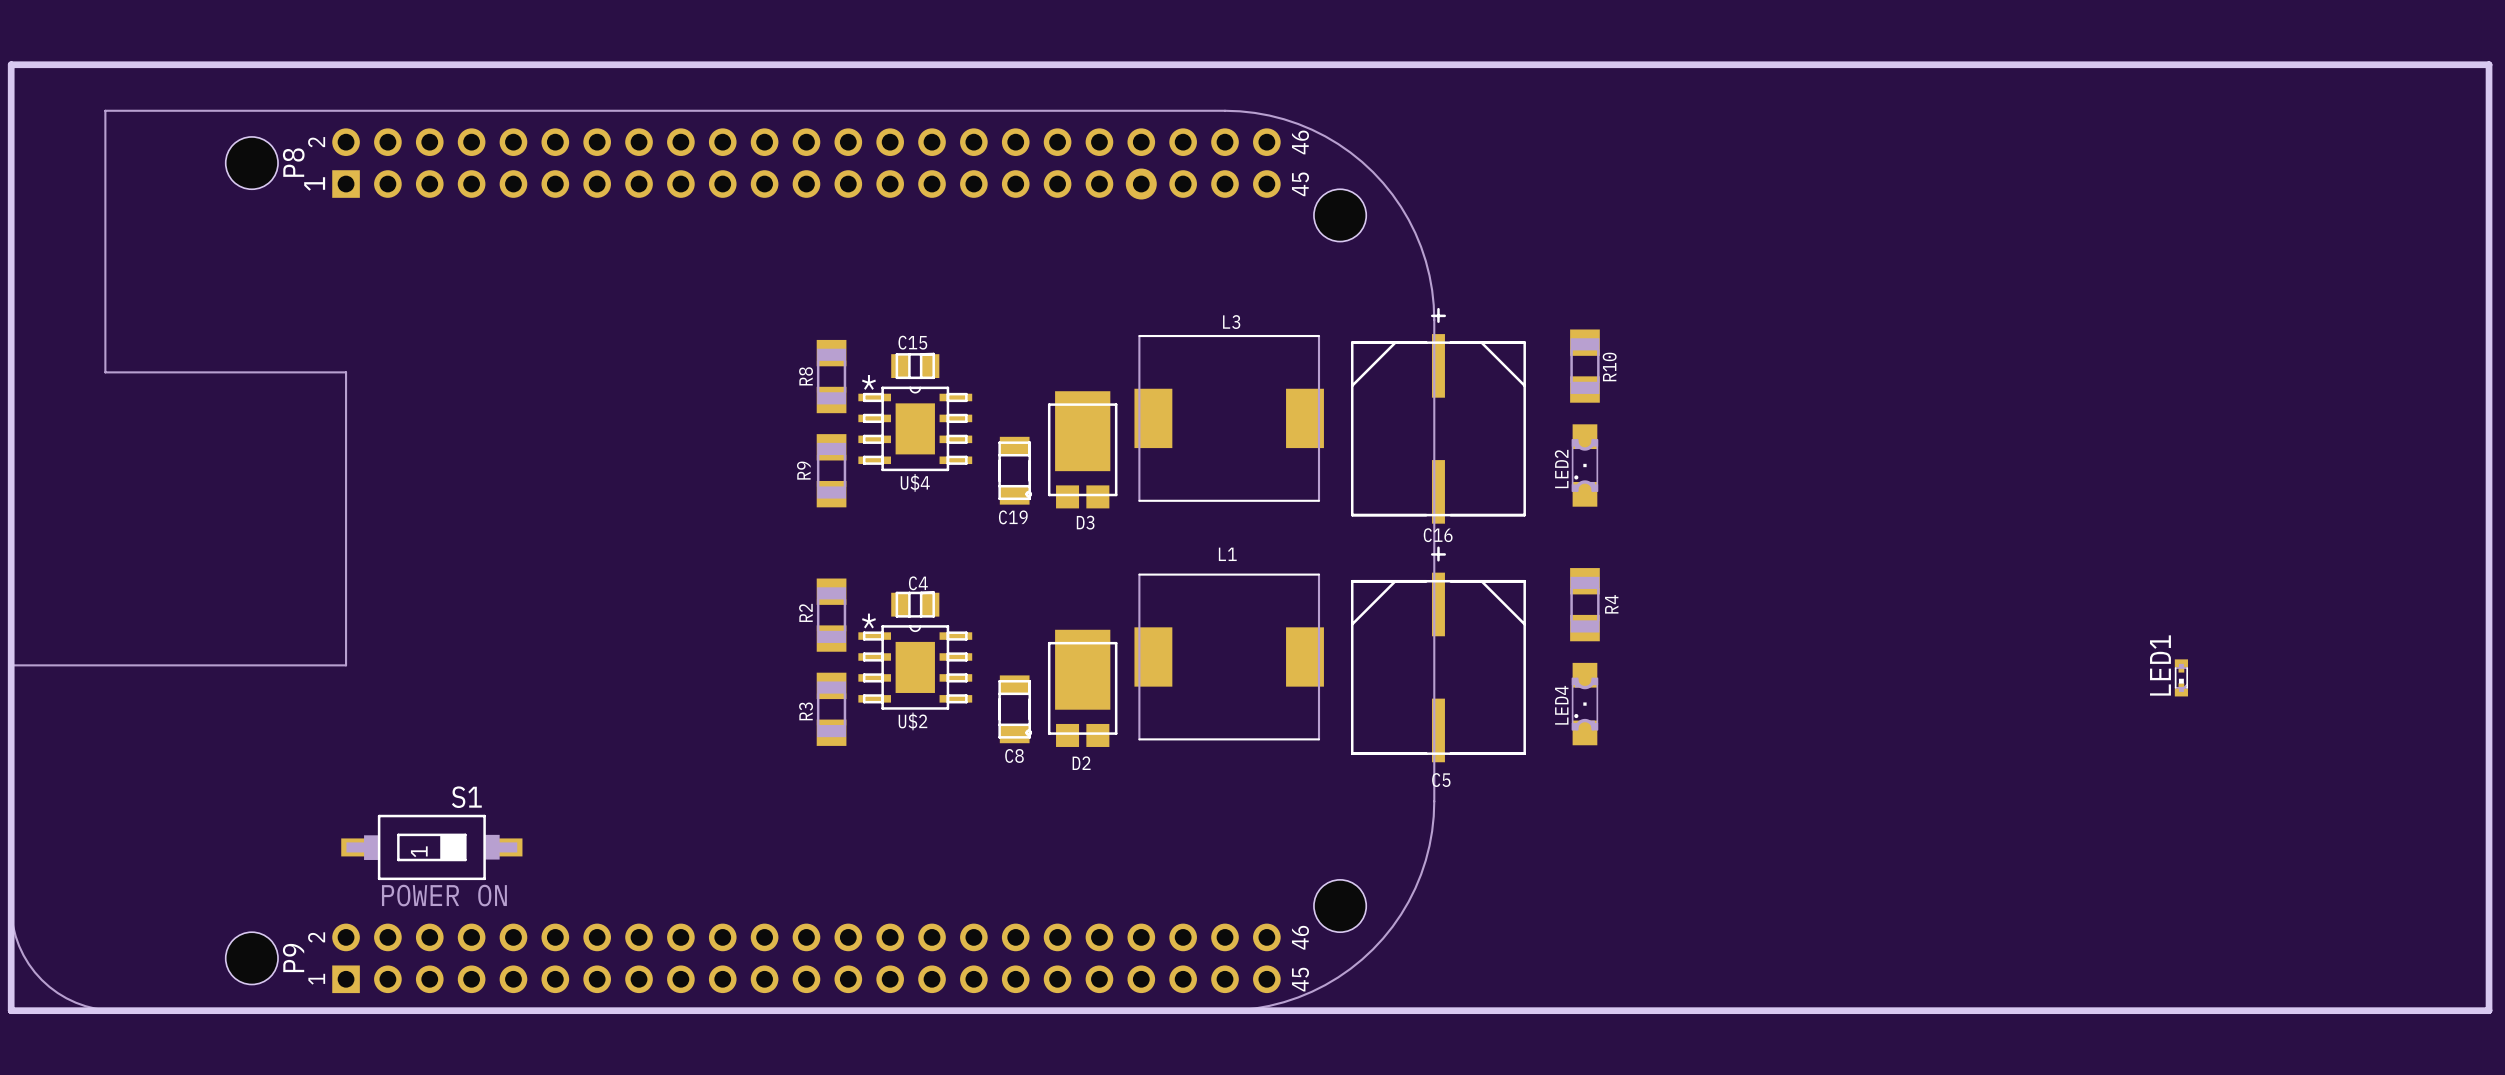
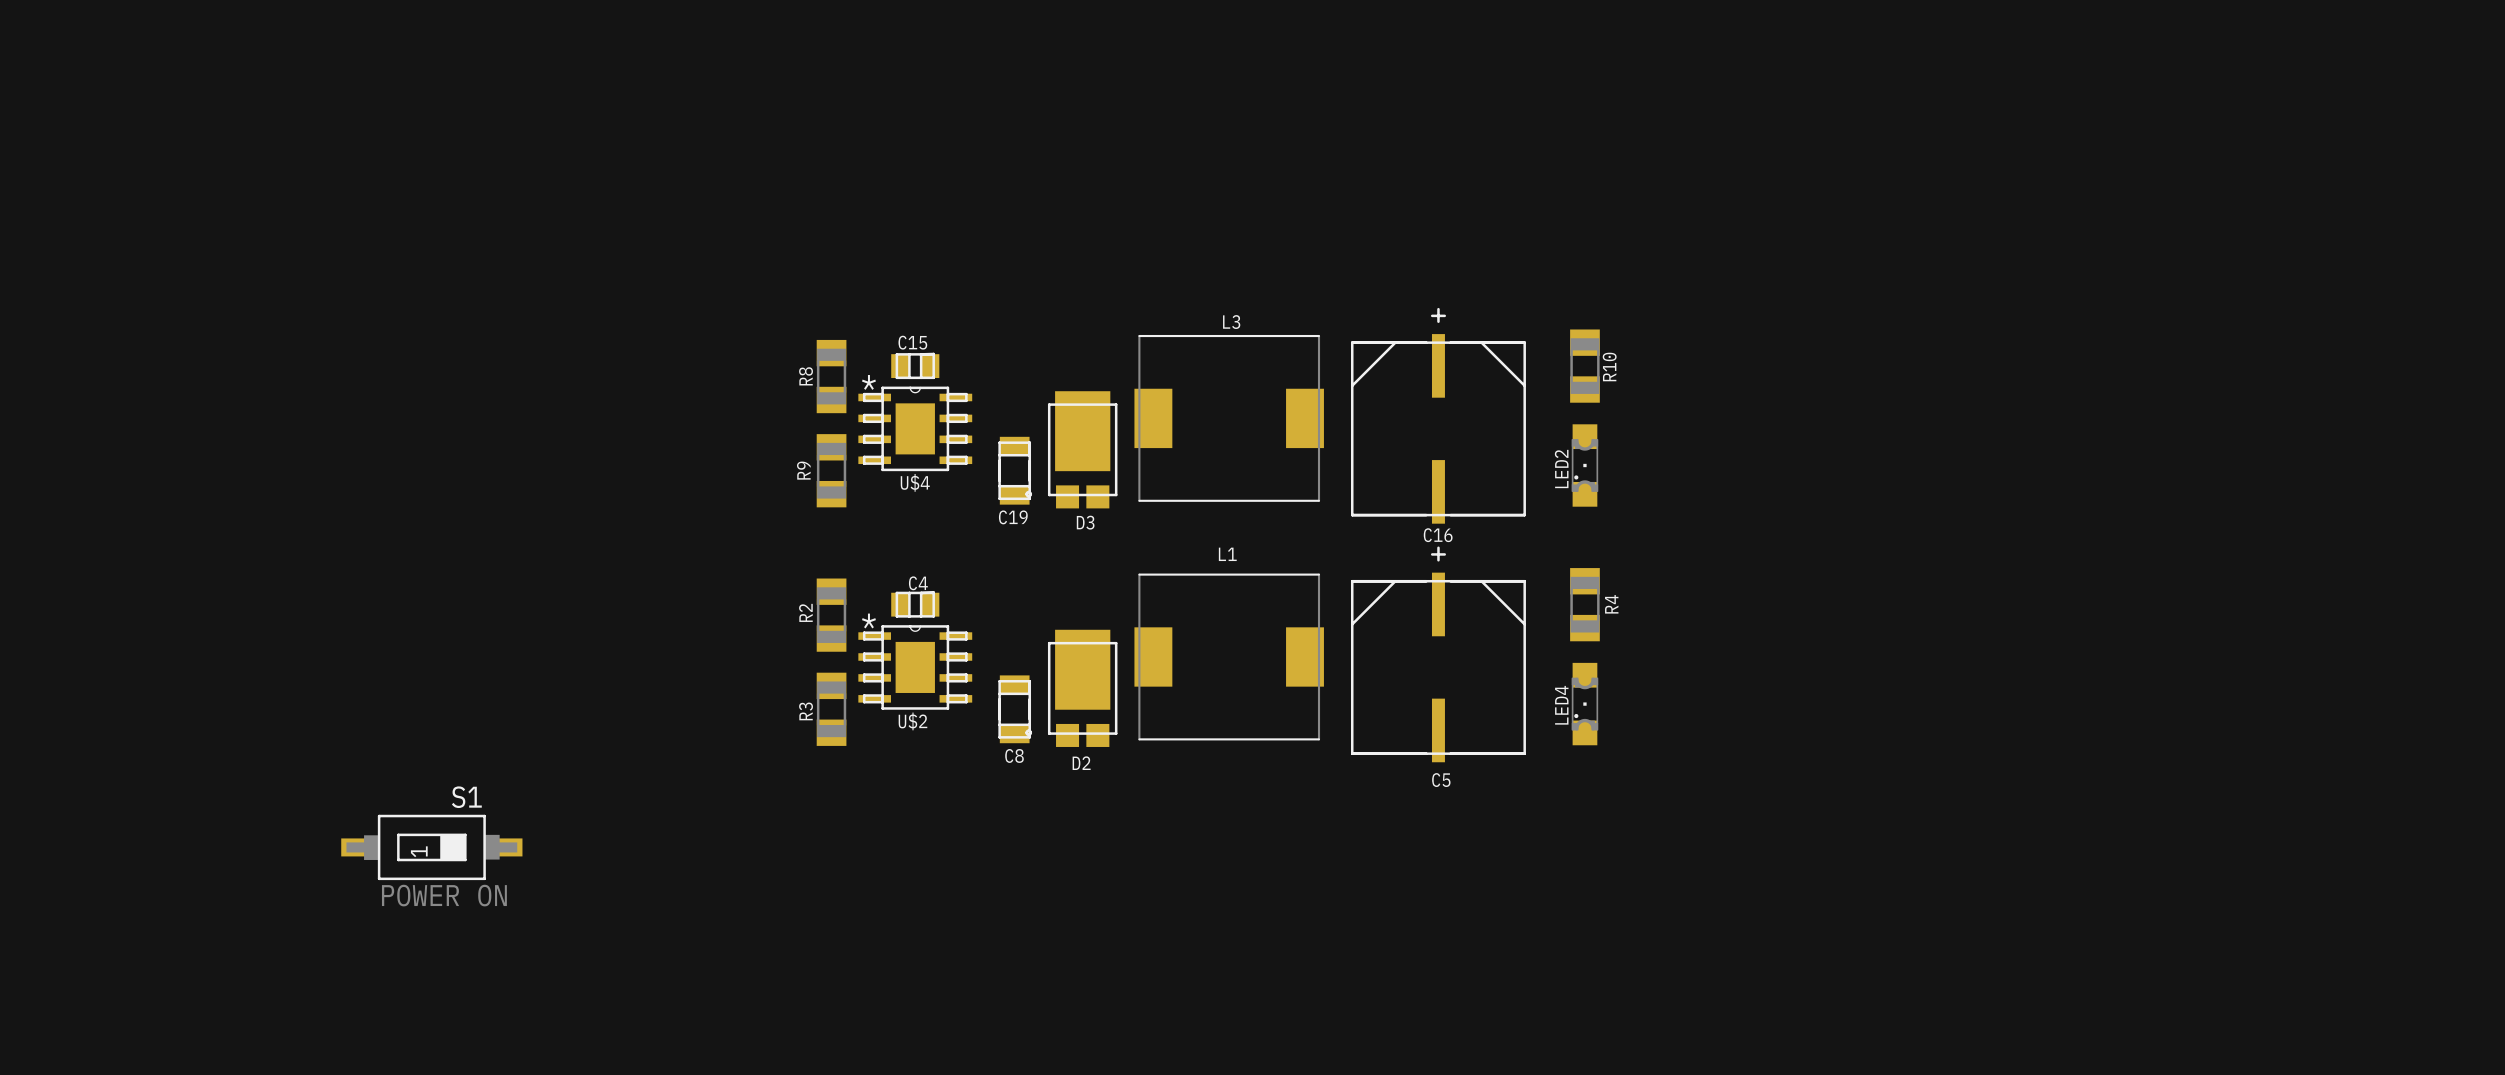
board edge: (11, 64) (2489, 64) (2489, 1010) (11, 1010) (11, 64) -> none
part: (722, 560) -> none
LED1: (2181, 677) -> none

